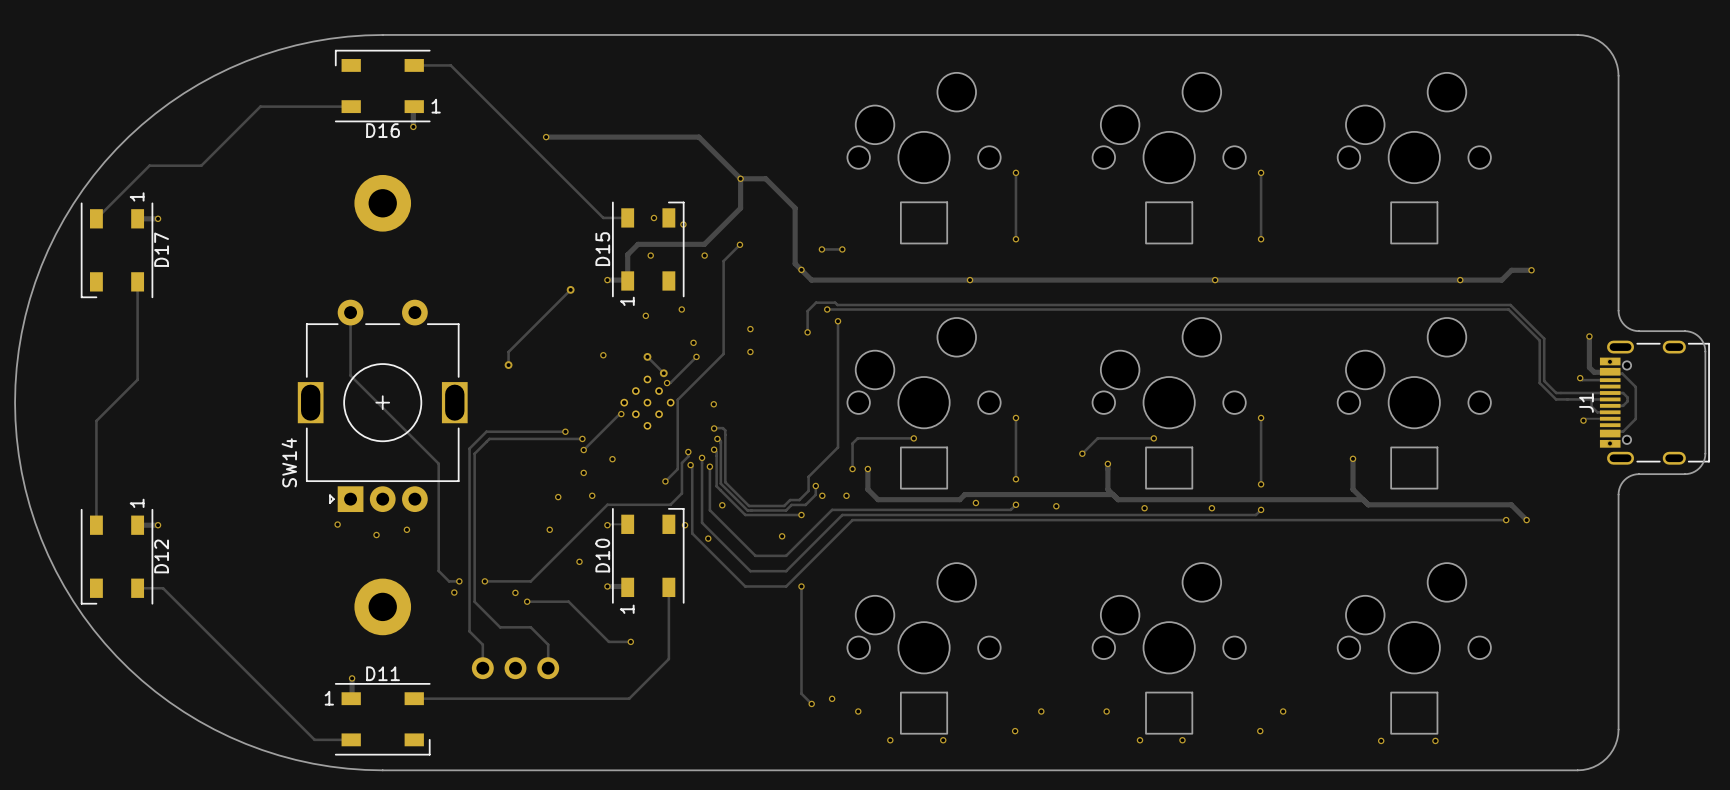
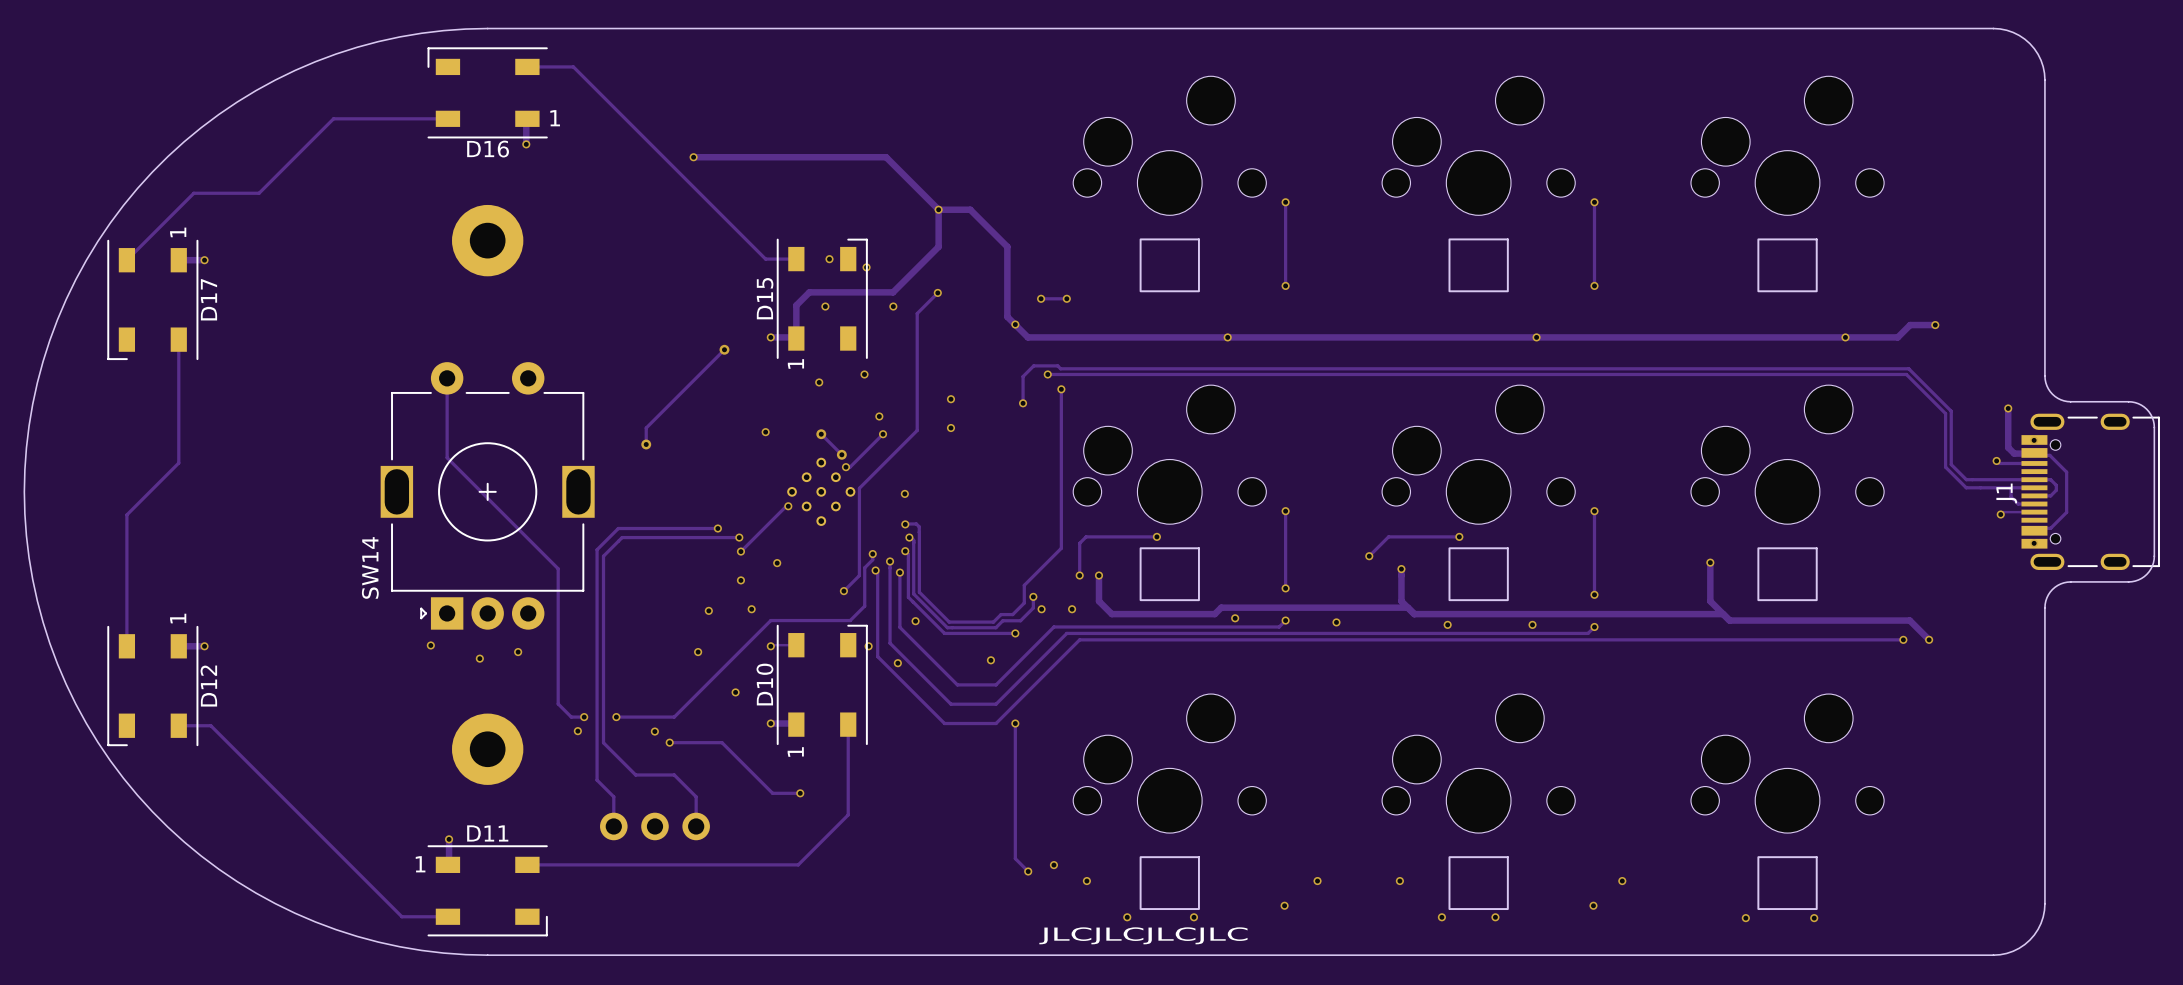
text: none -> JLCJLCJLCJLC (1143, 935)

